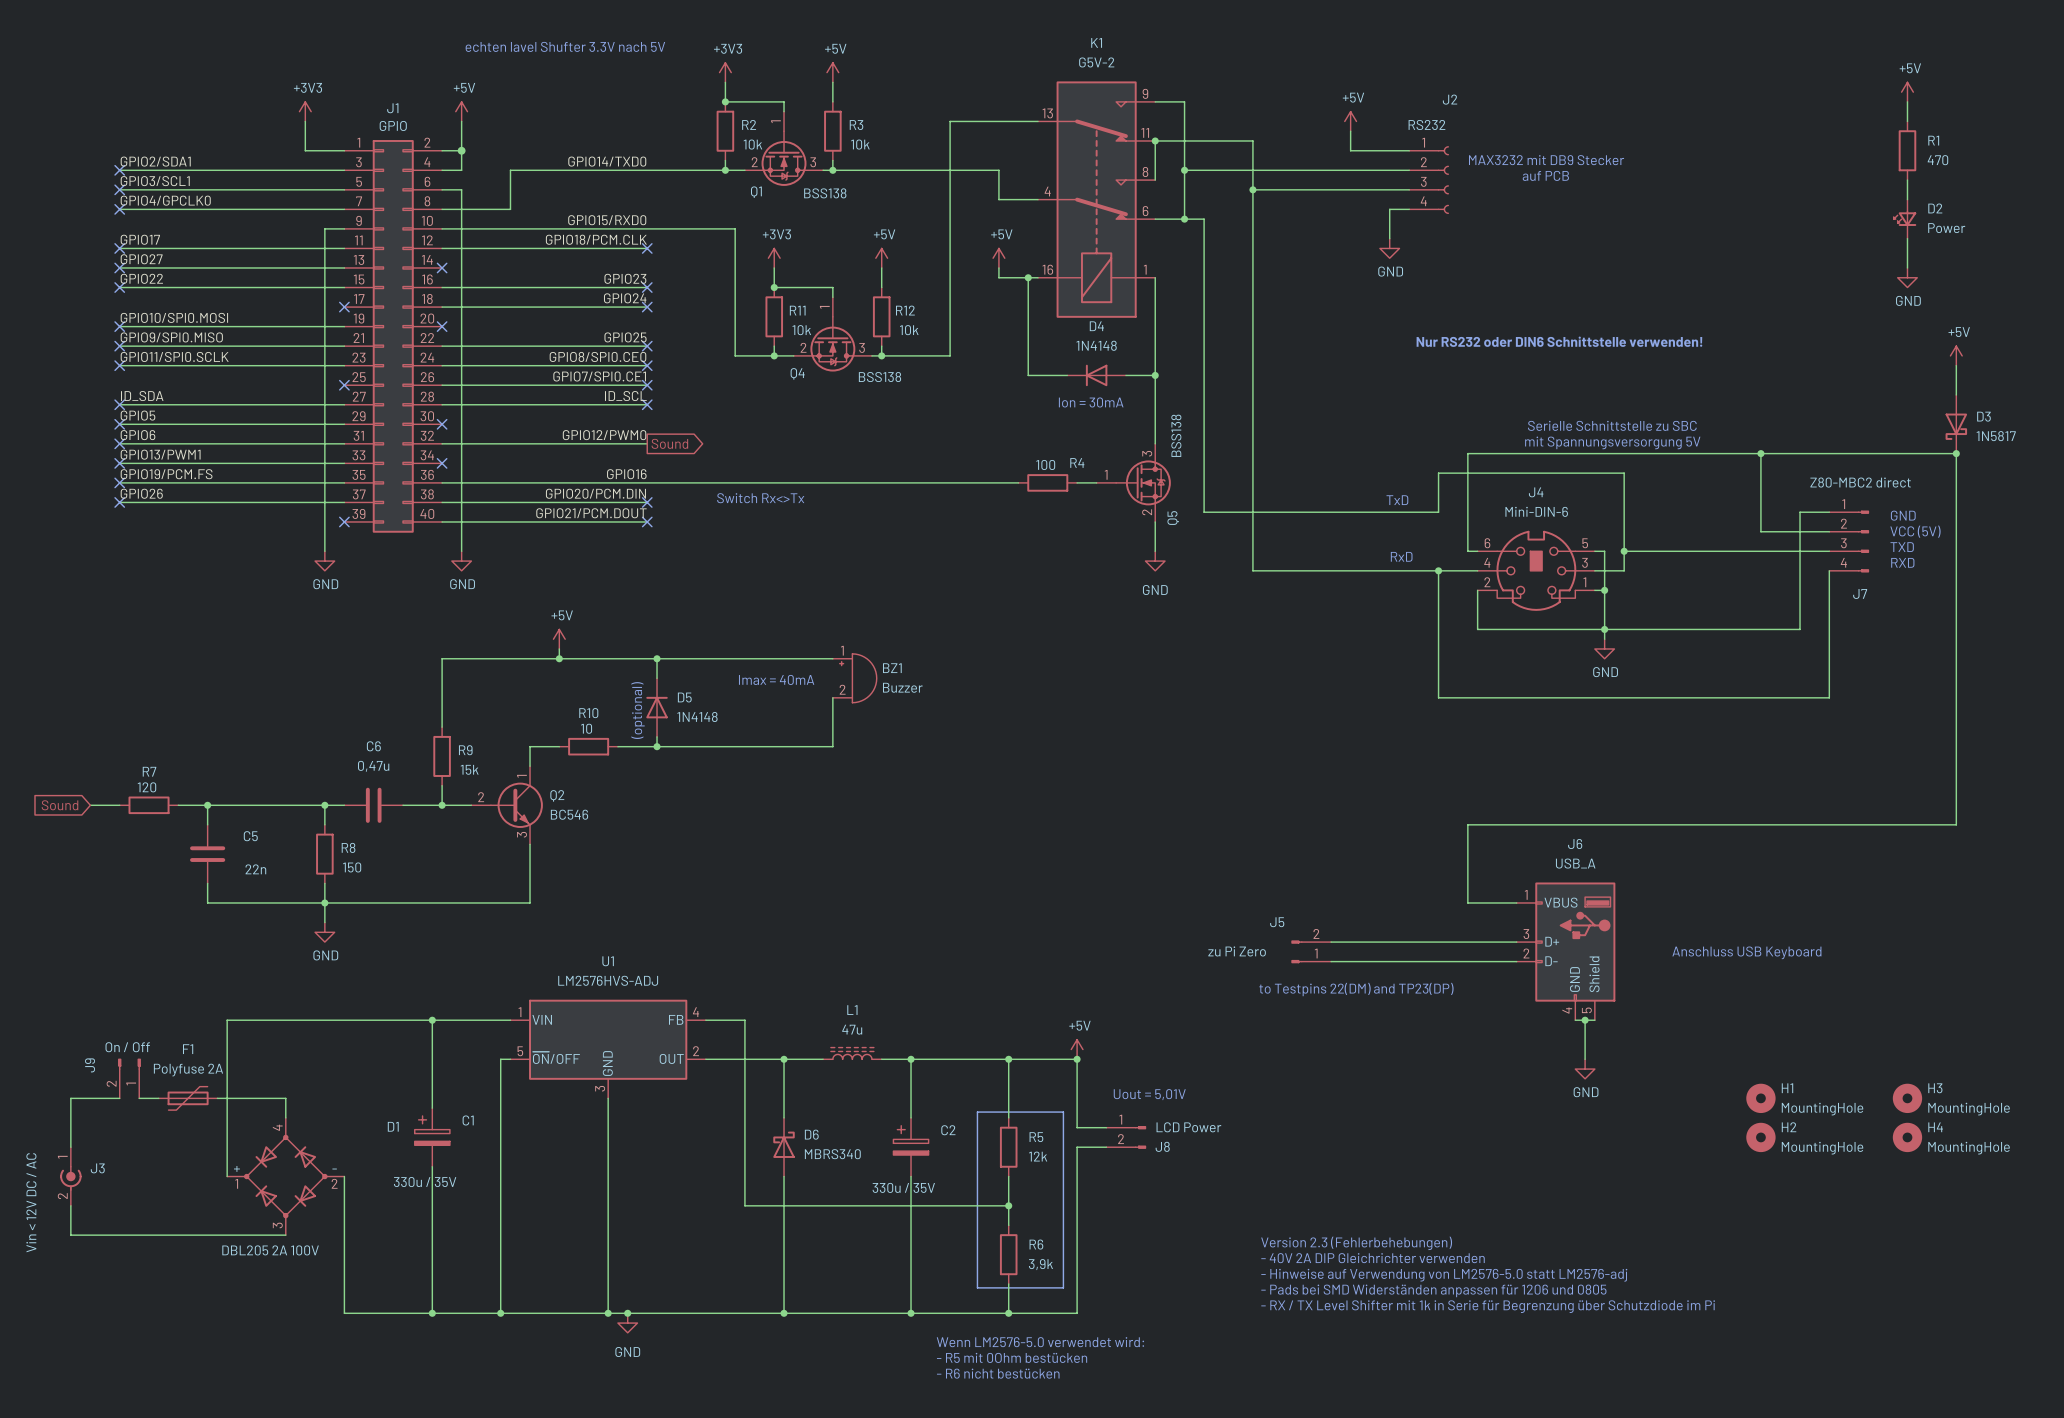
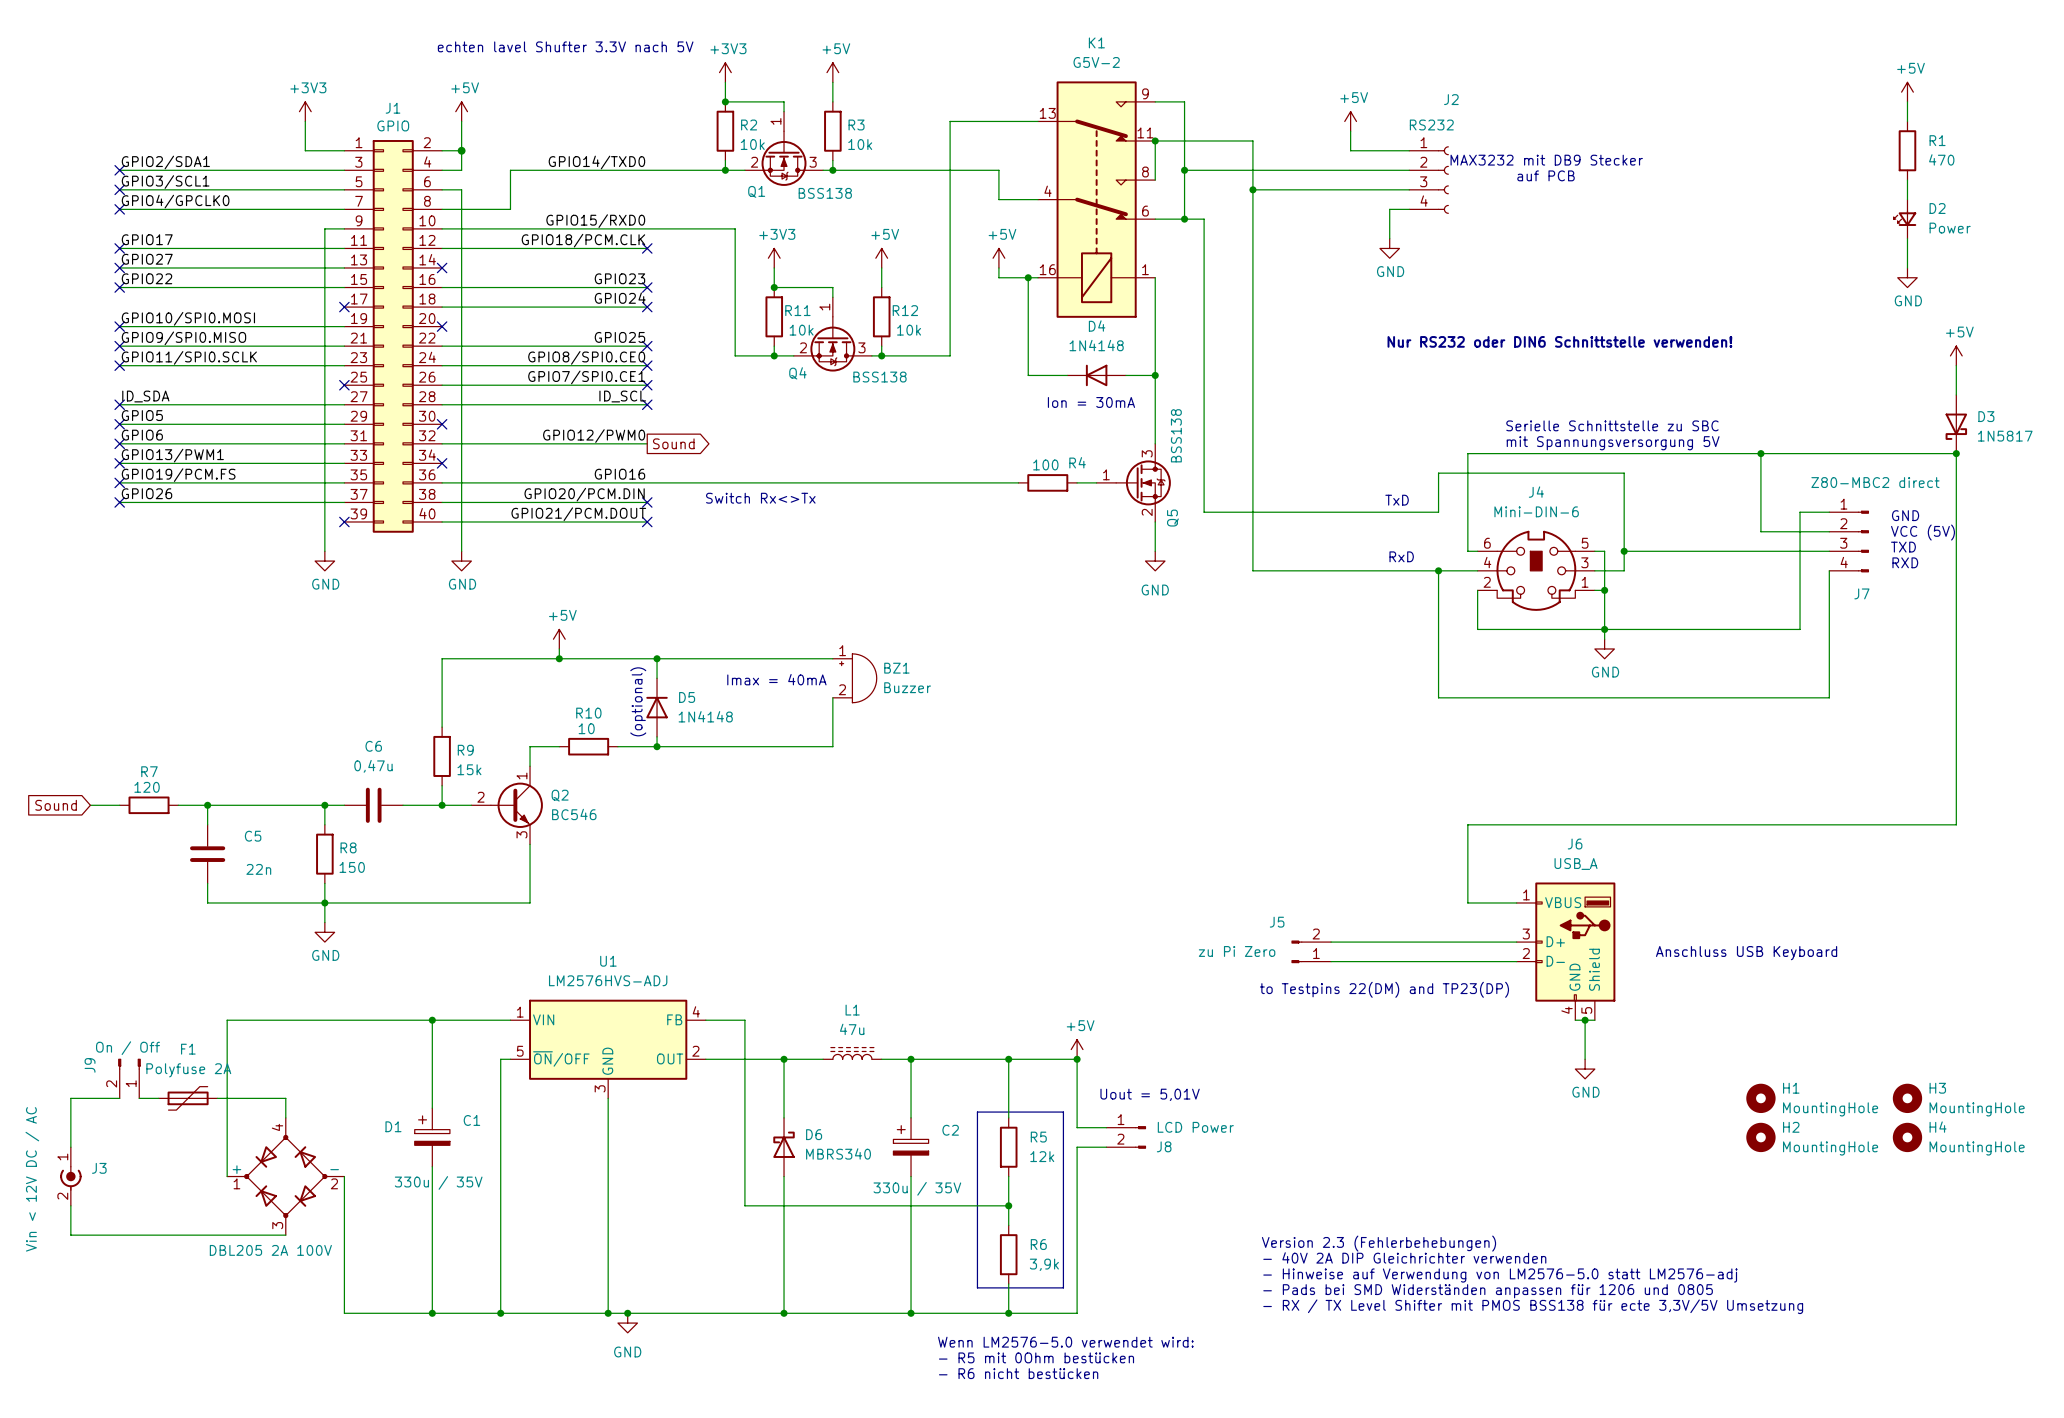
text: - RX / TX Level Shifter mit 1k in Serie für Begrenzung über Schutzdiode im Pi (1488, 1306) -> - RX / TX Level Shifter mit PMOS BSS138 für ecte 3,3V/5V Umsetzung (1533, 1306)

